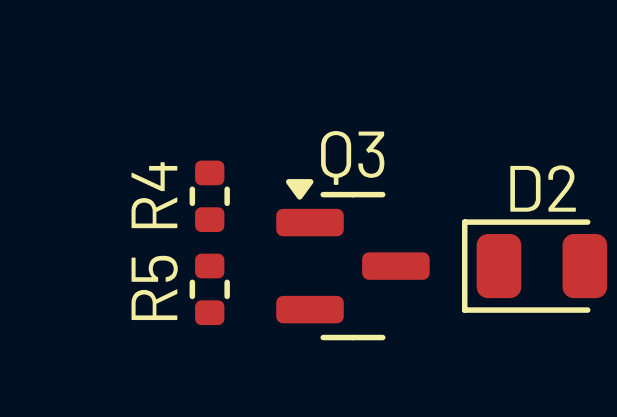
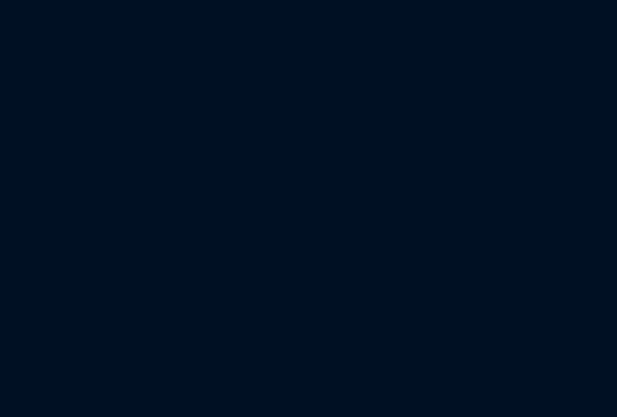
R4: (209, 196) -> none
Q3: (352, 259) -> none
D2: (534, 266) -> none
R5: (209, 289) -> none

